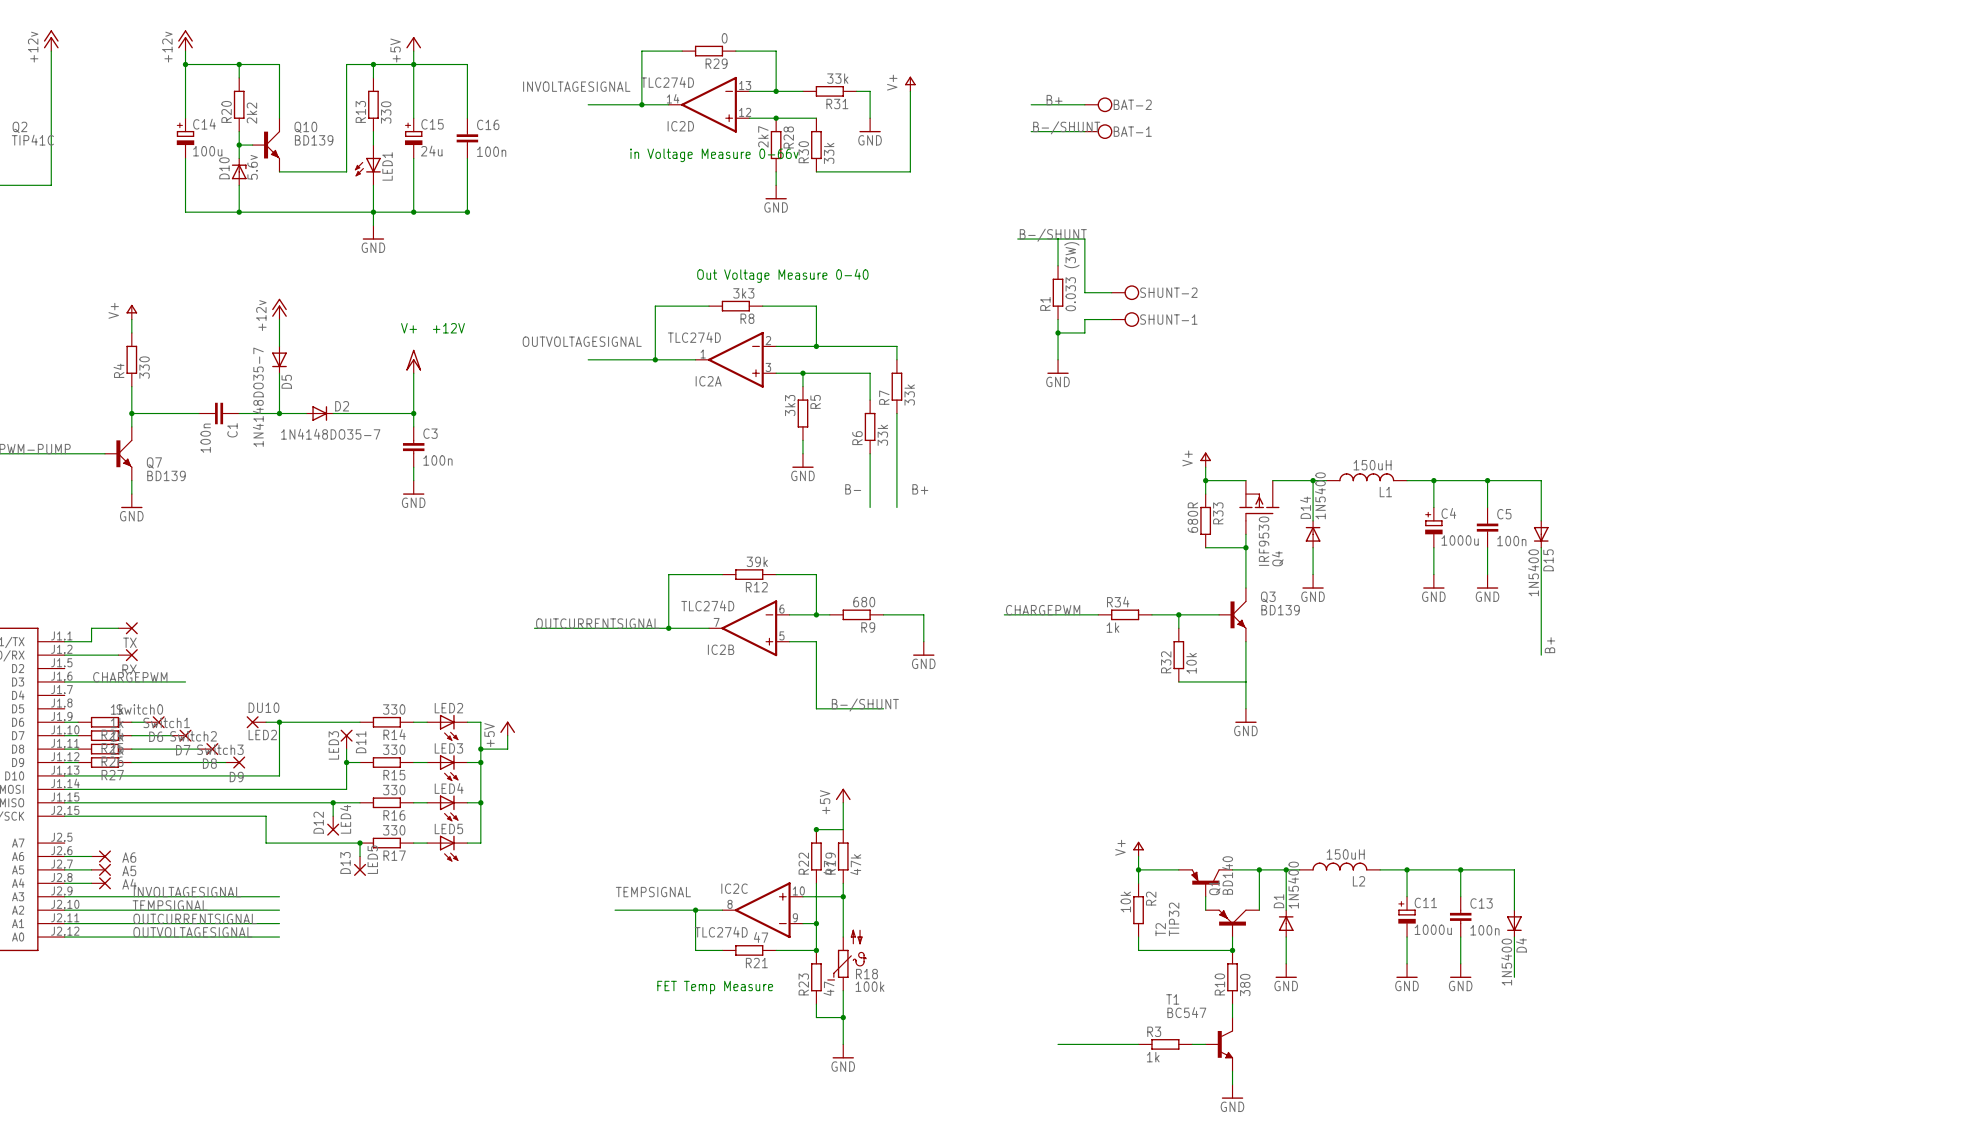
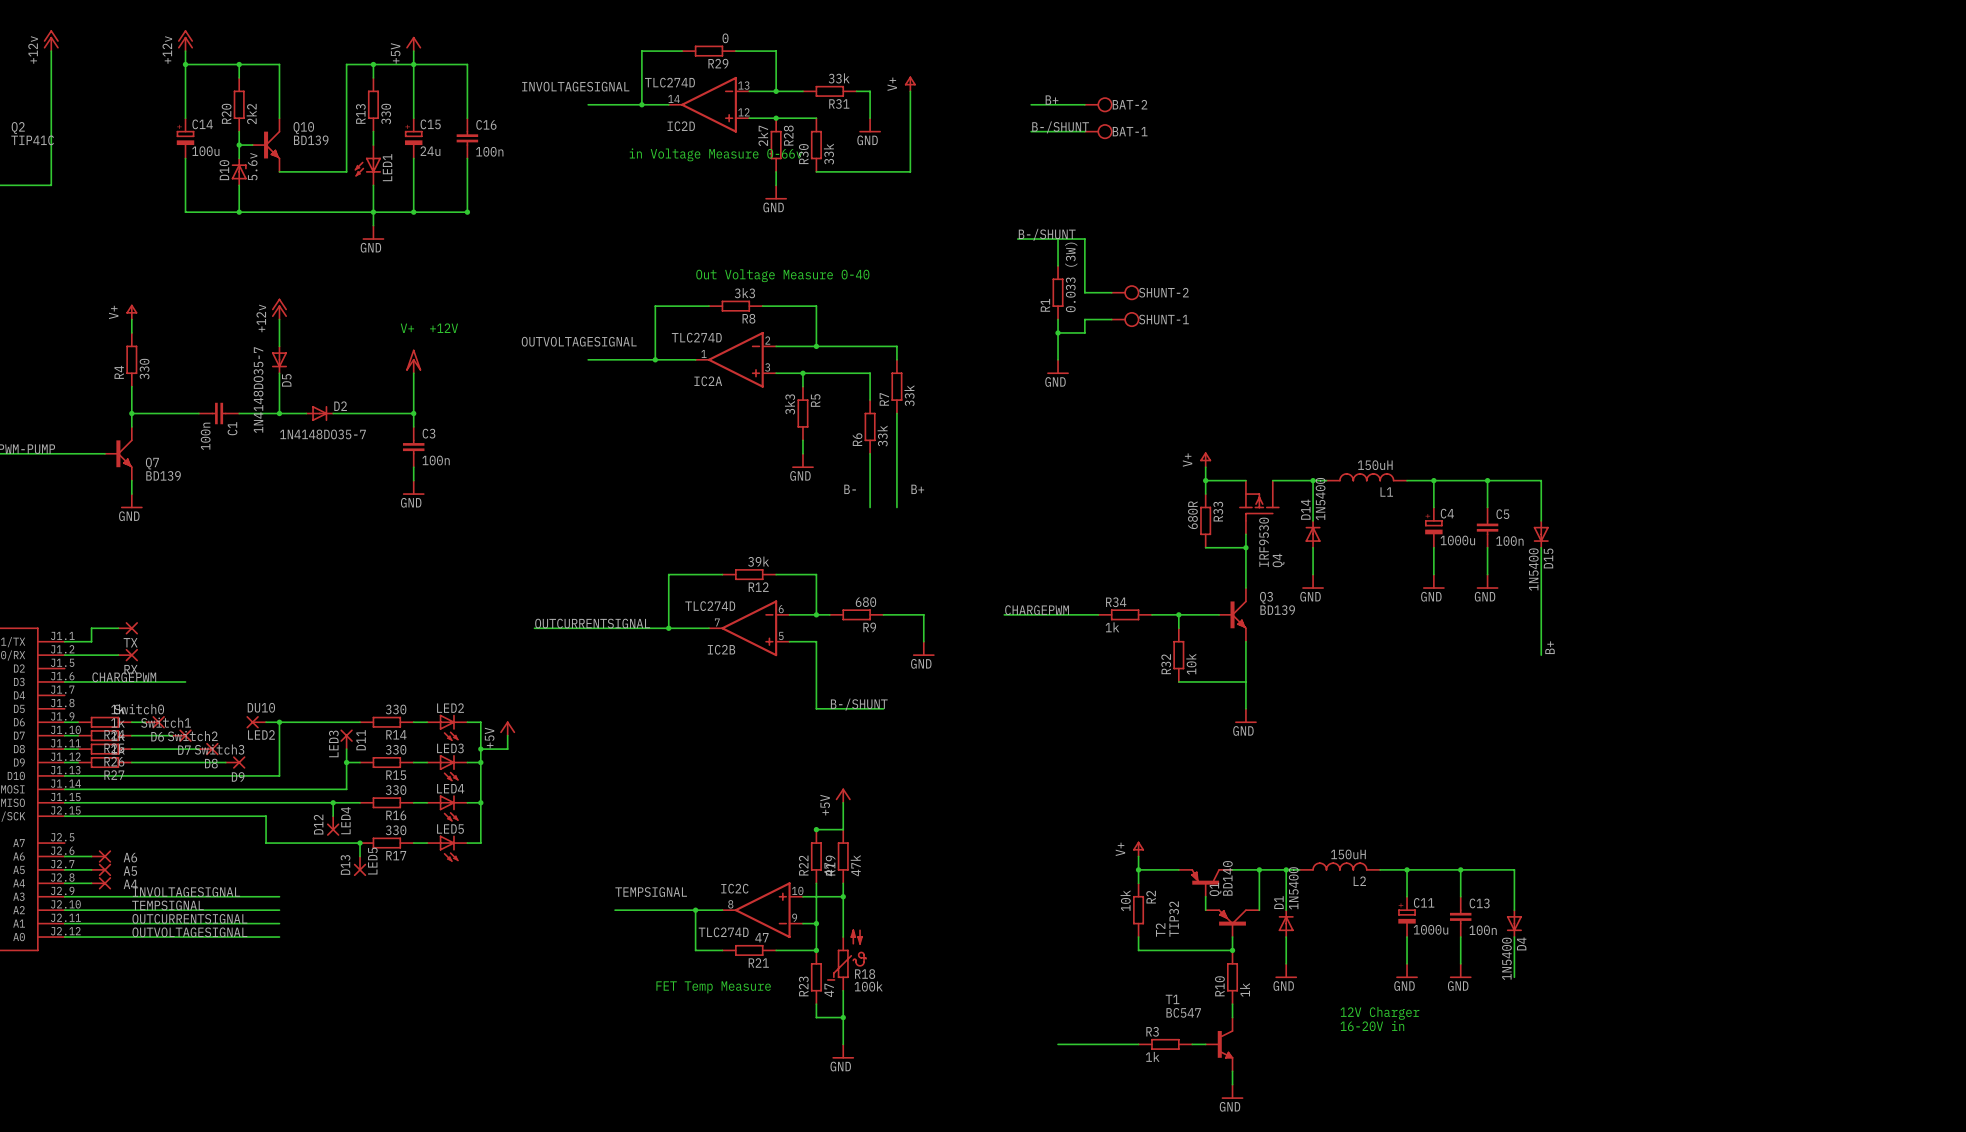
R10 value: 380 (1245, 985) -> 1k (1244, 989)
text: none -> 12V Charger (1379, 1013)
text: none -> 16-20V in (1372, 1026)

